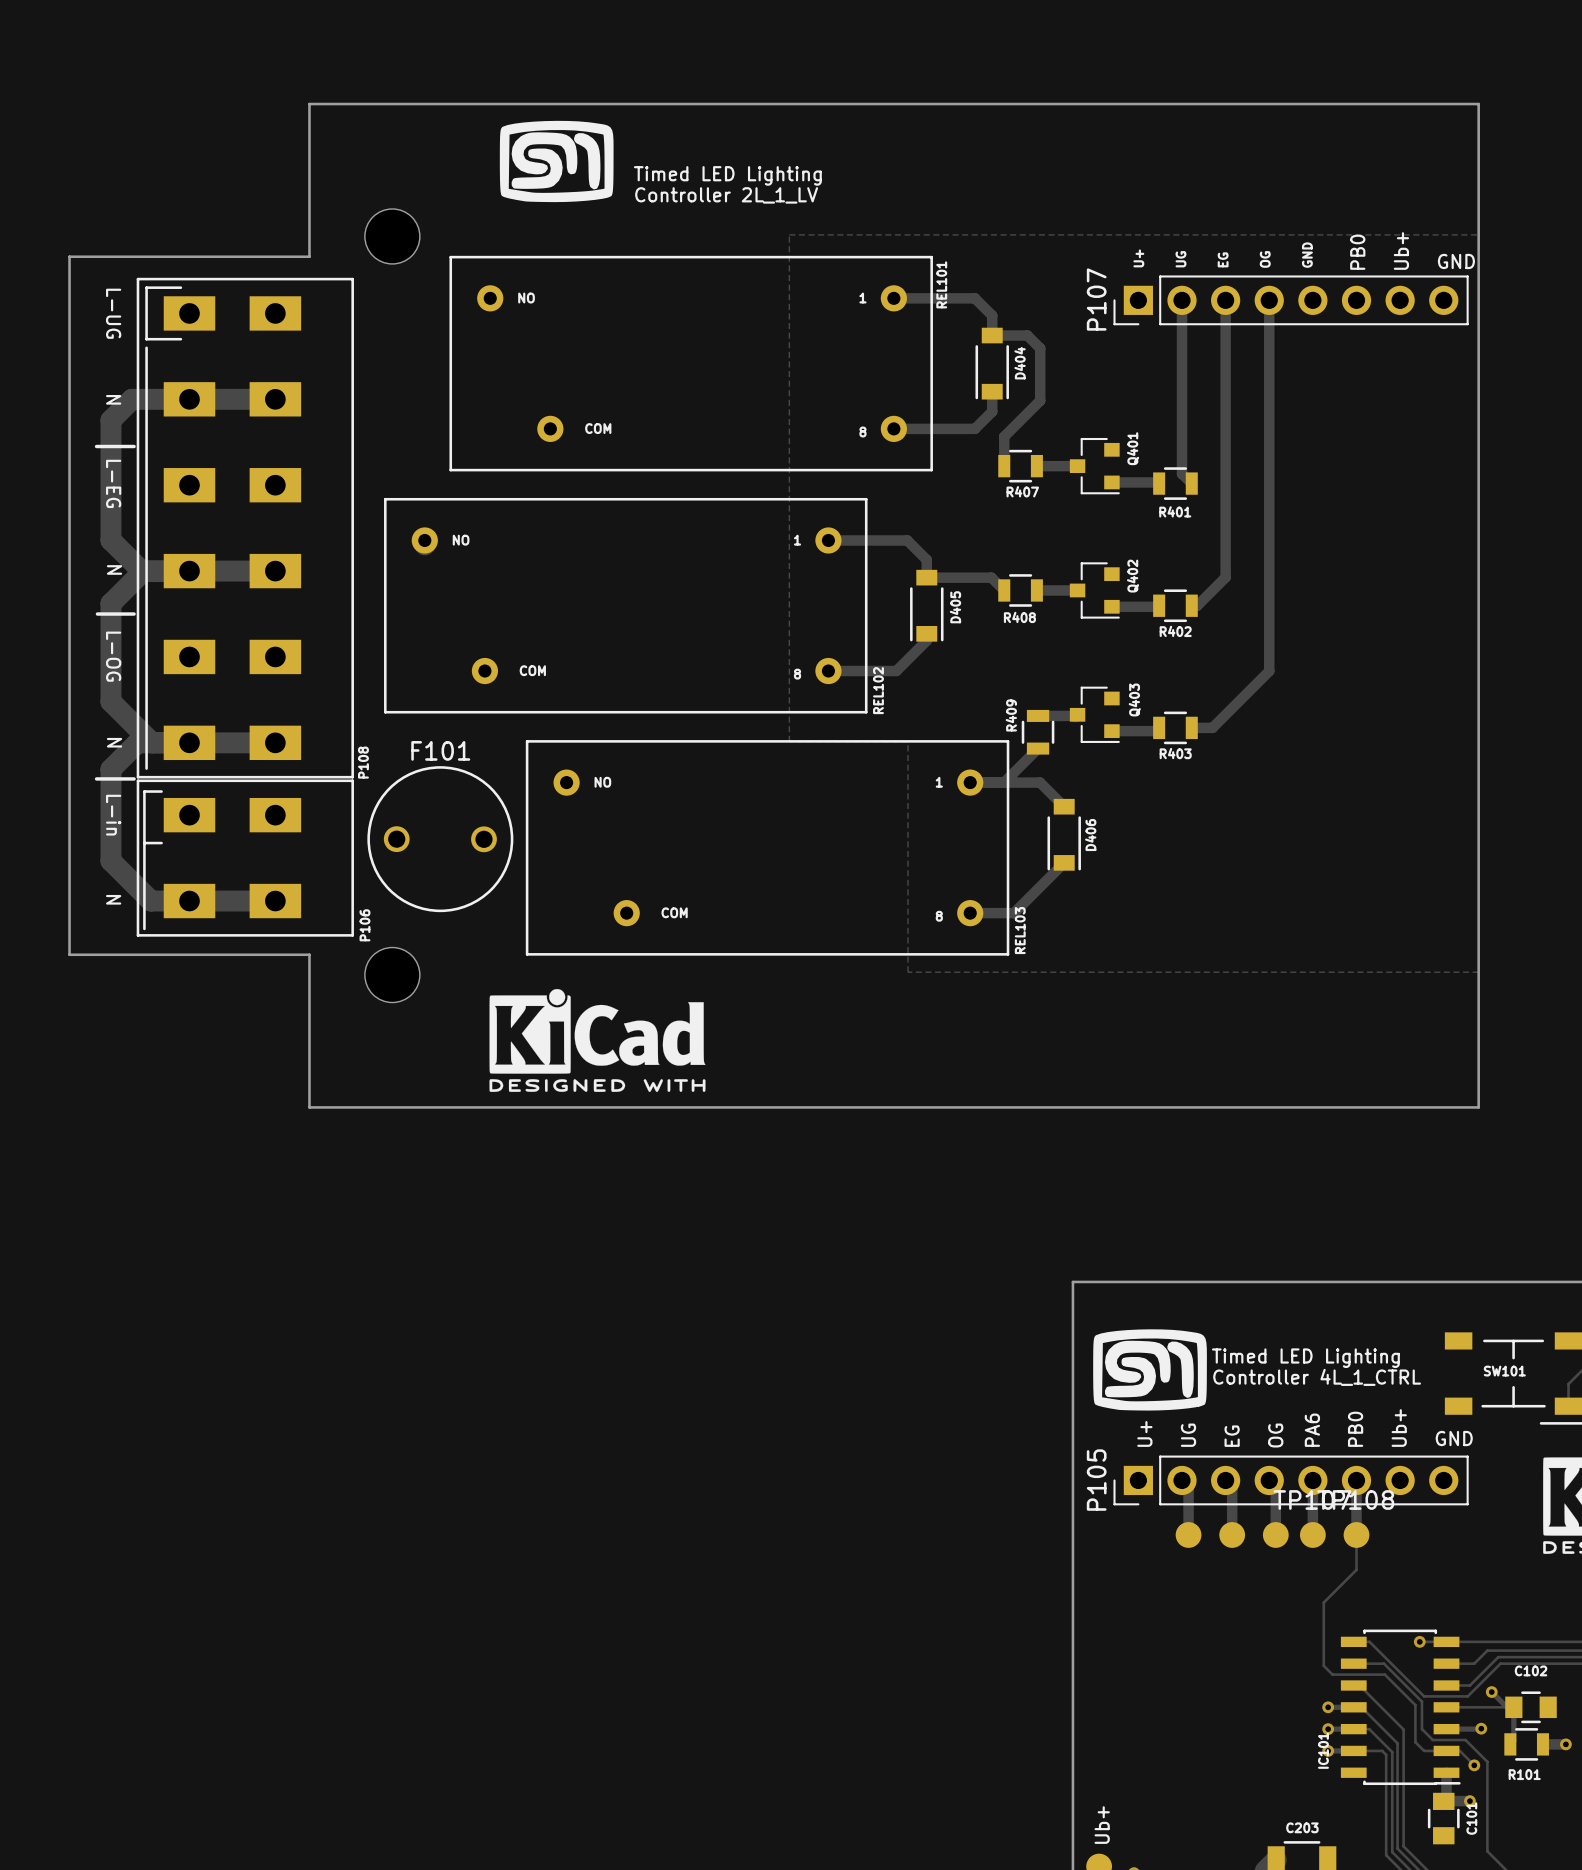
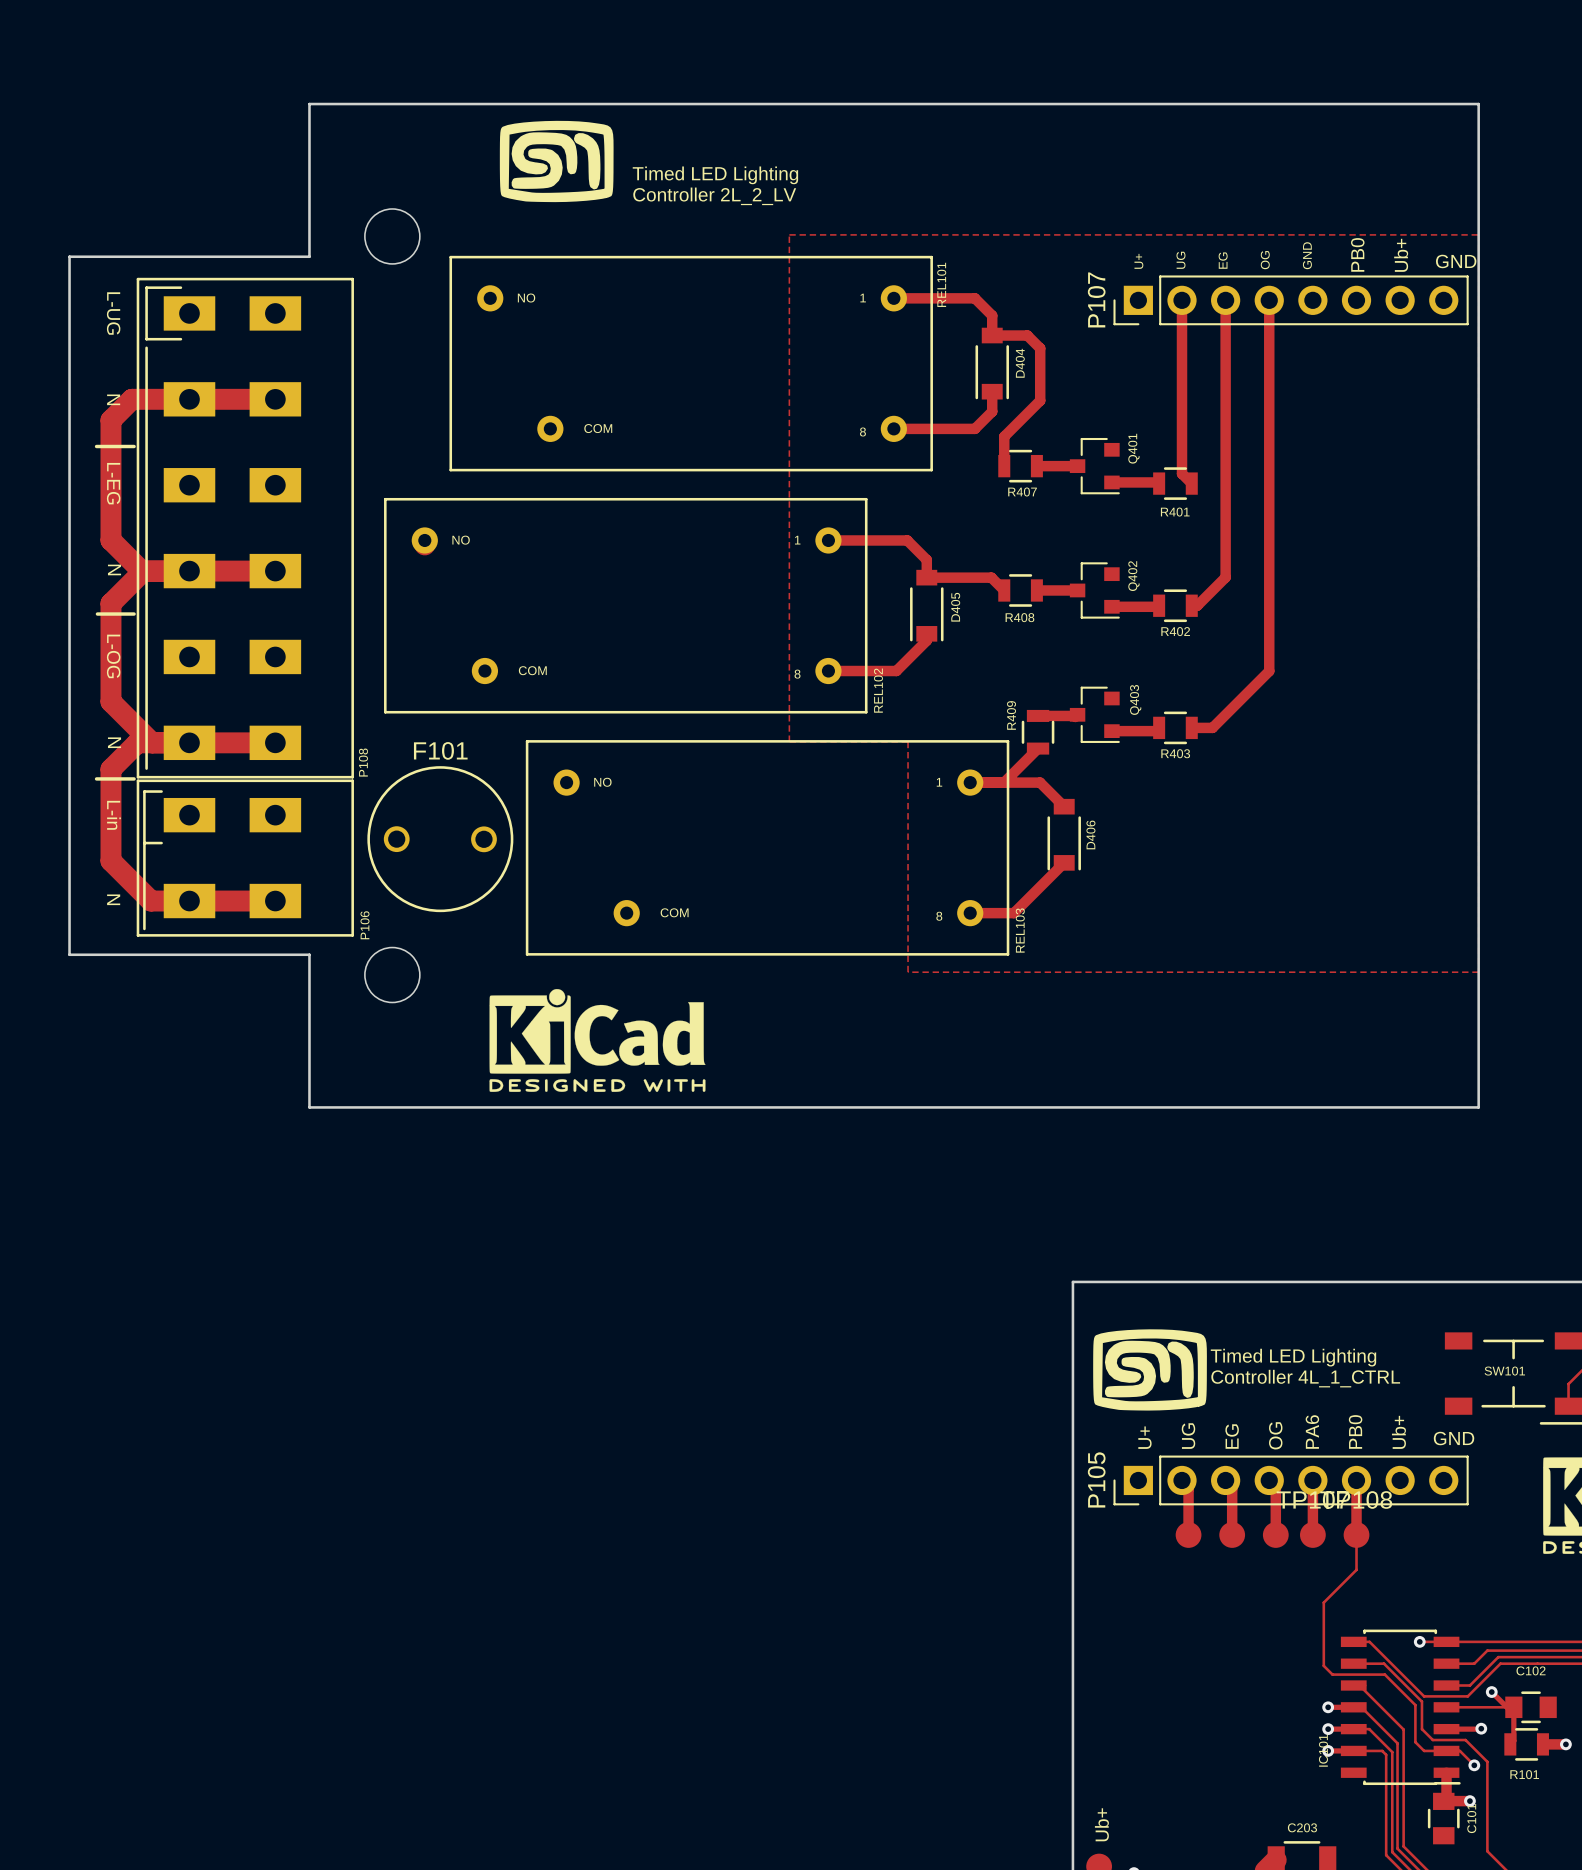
text: Controller 2L_1_LV (726, 195) -> Controller 2L_2_LV (714, 196)

